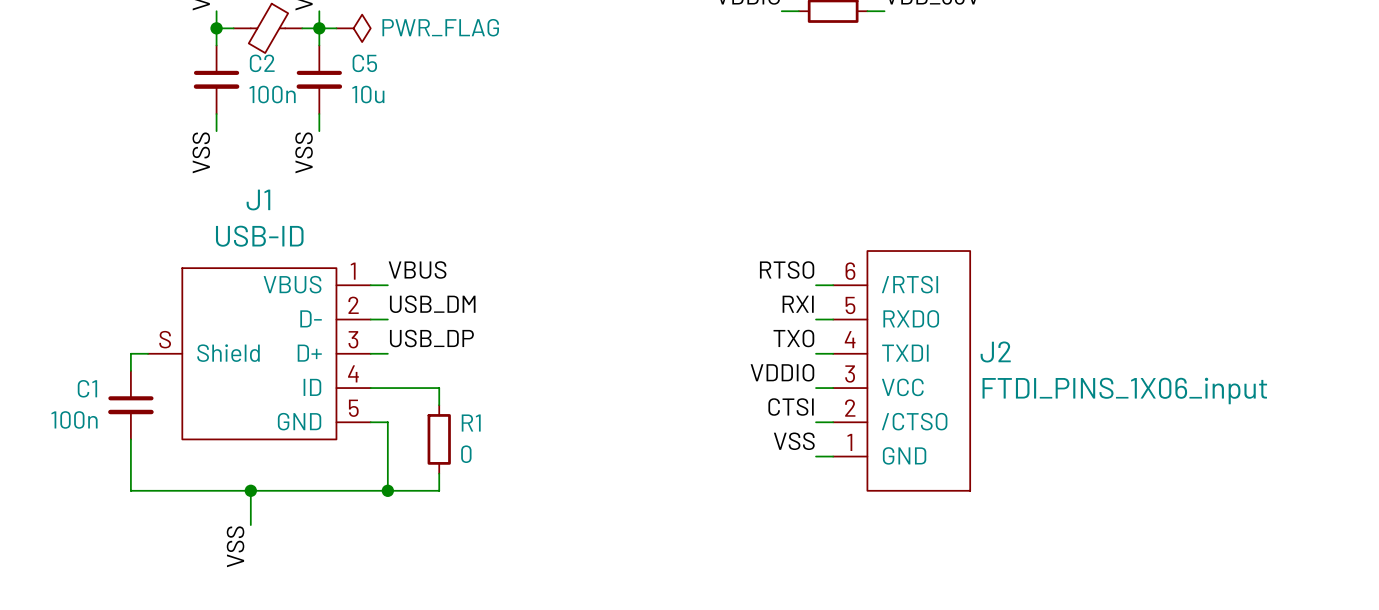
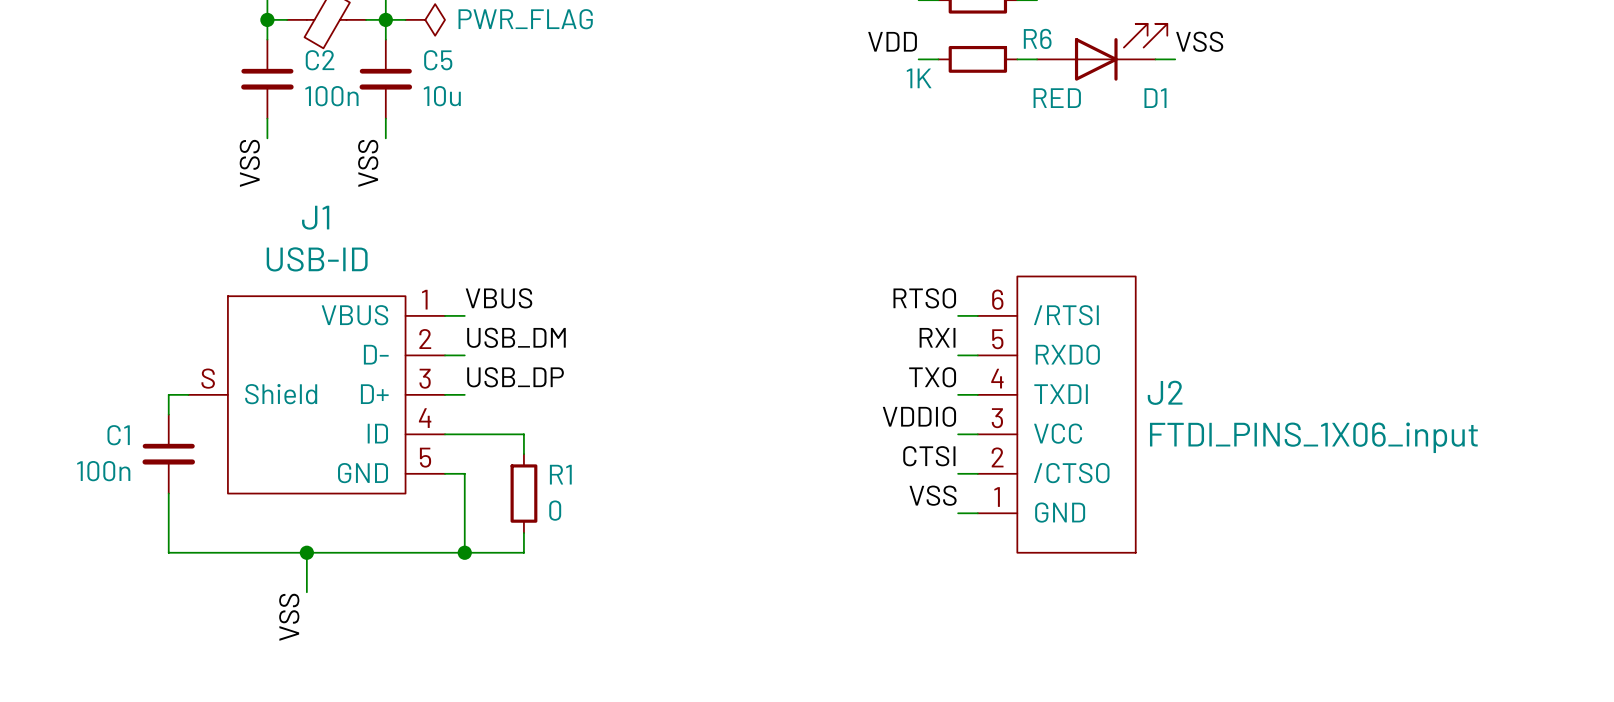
label: none -> VDD (892, 41)
label: none -> VSS (1199, 41)
D1: none -> RED (1102, 52)
wire: none -> (918, 59) (938, 59)
R6: none -> 1K (977, 59)
wire: none -> (1017, 59) (1037, 59)
wire: none -> (1155, 59) (1175, 59)

